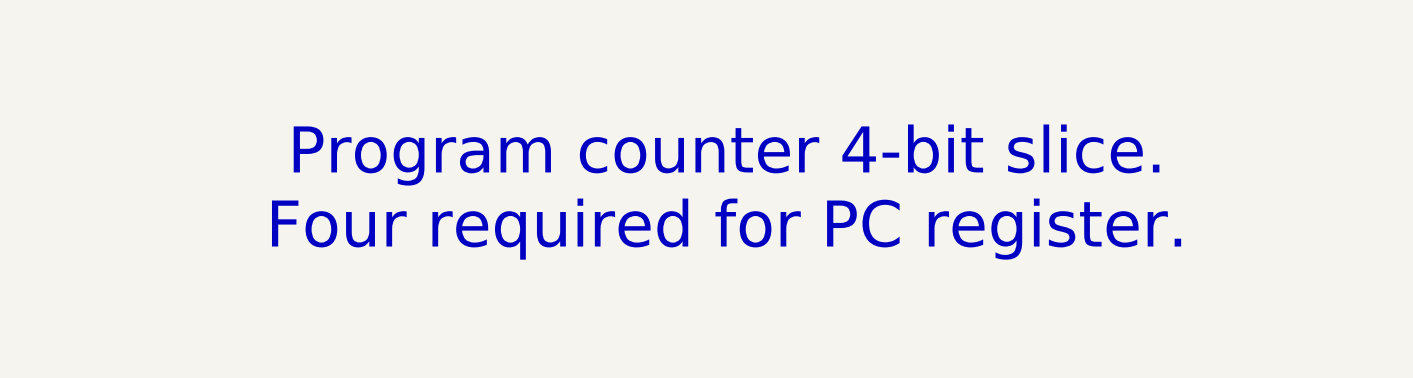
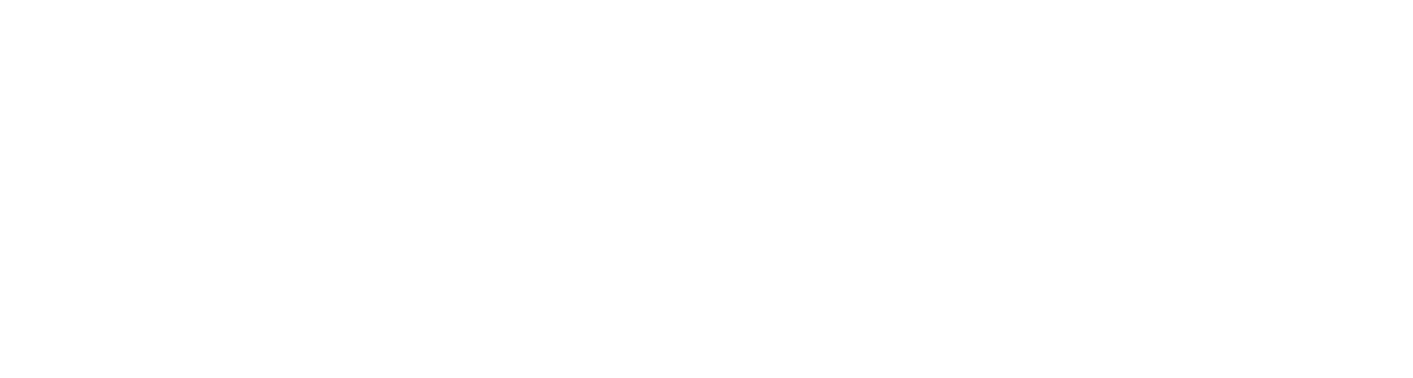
text: Program counter 4-bit slice. (726, 155) -> none
text: Four required for PC register. (726, 229) -> none

